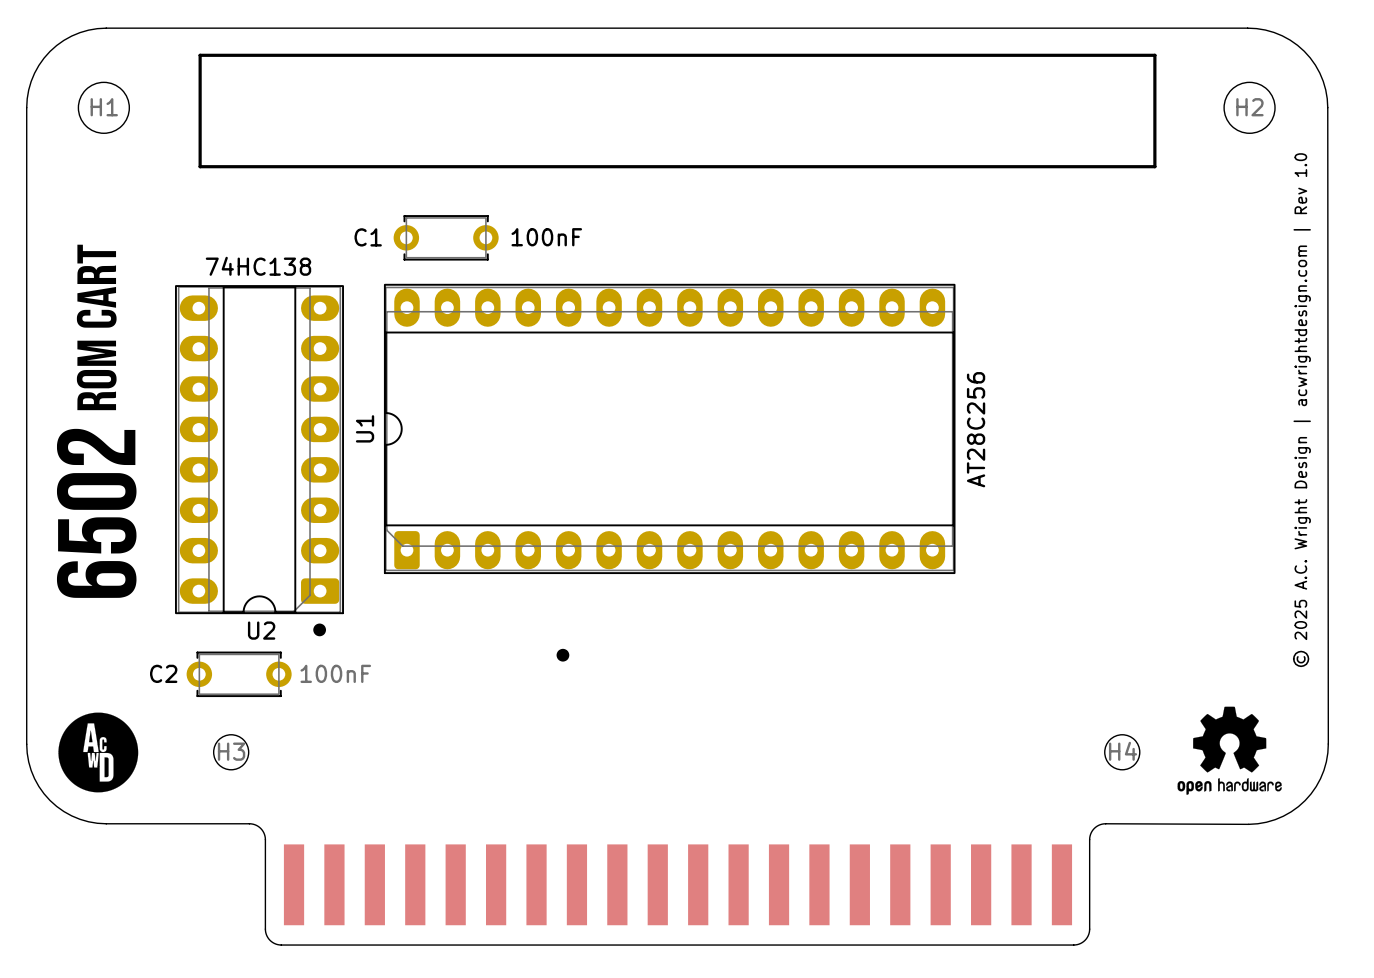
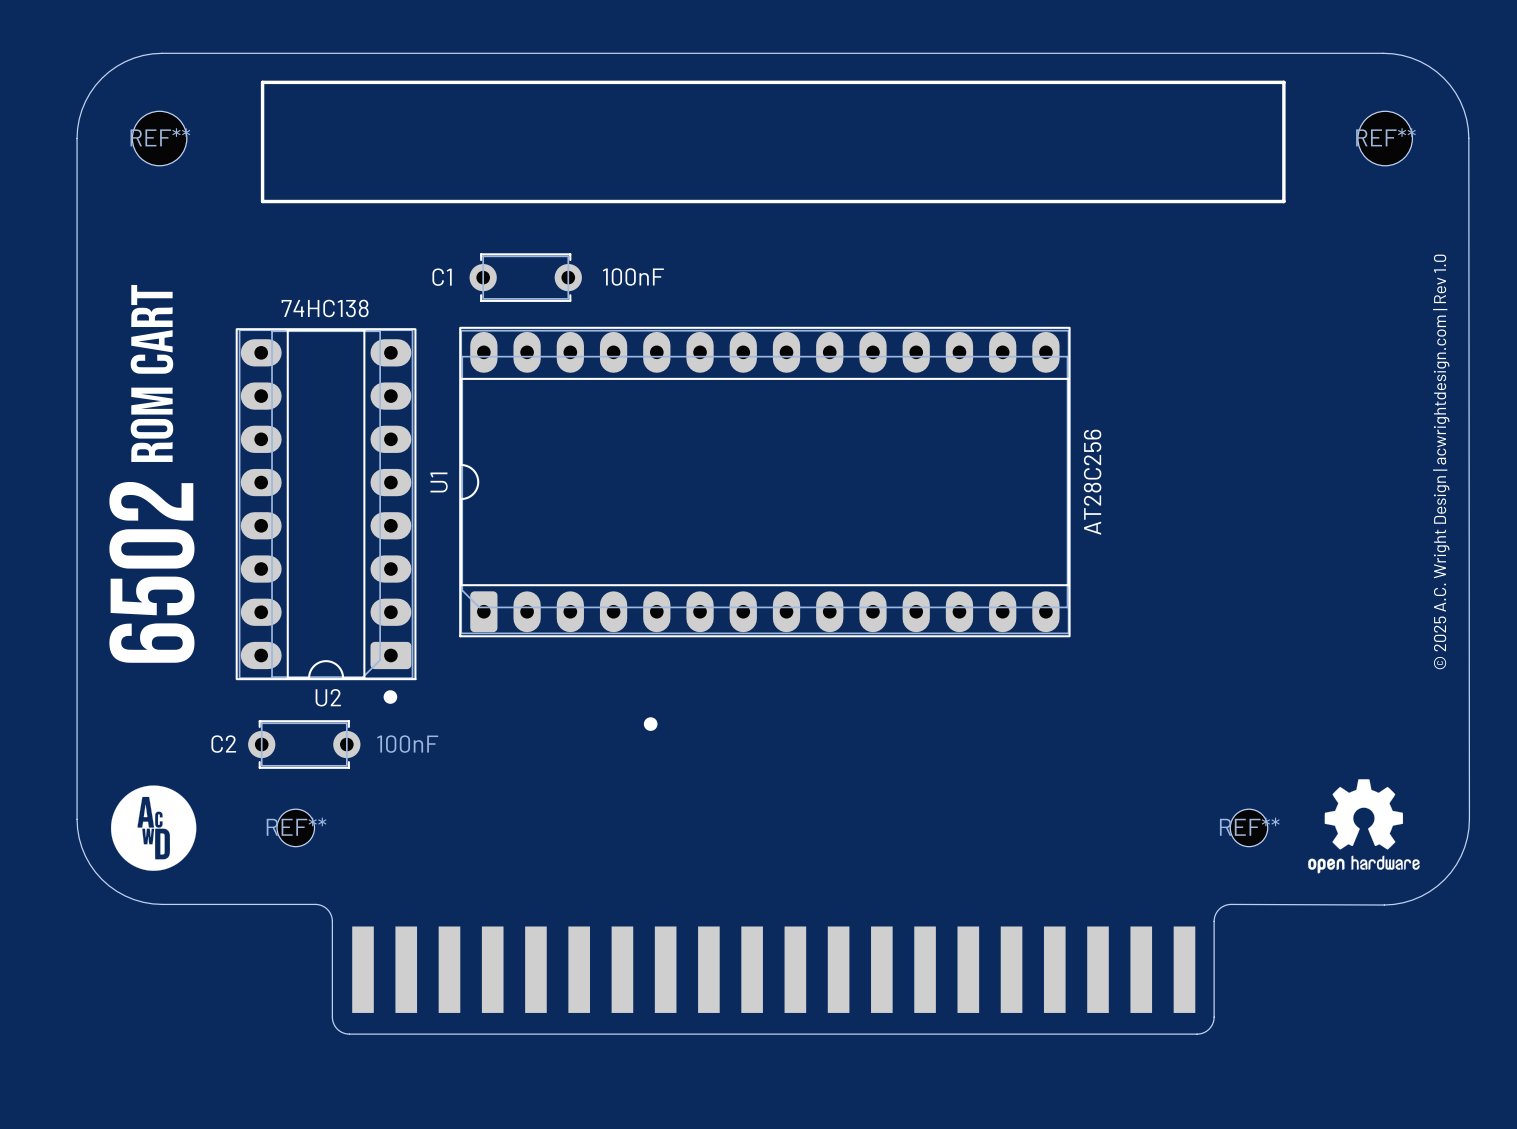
H1 name: H1 (104, 107) -> REF** (160, 137)
H2 name: H2 (1249, 107) -> REF** (1385, 137)
H3 name: H3 (231, 751) -> REF** (296, 826)
H4 name: H4 (1123, 751) -> REF** (1249, 826)

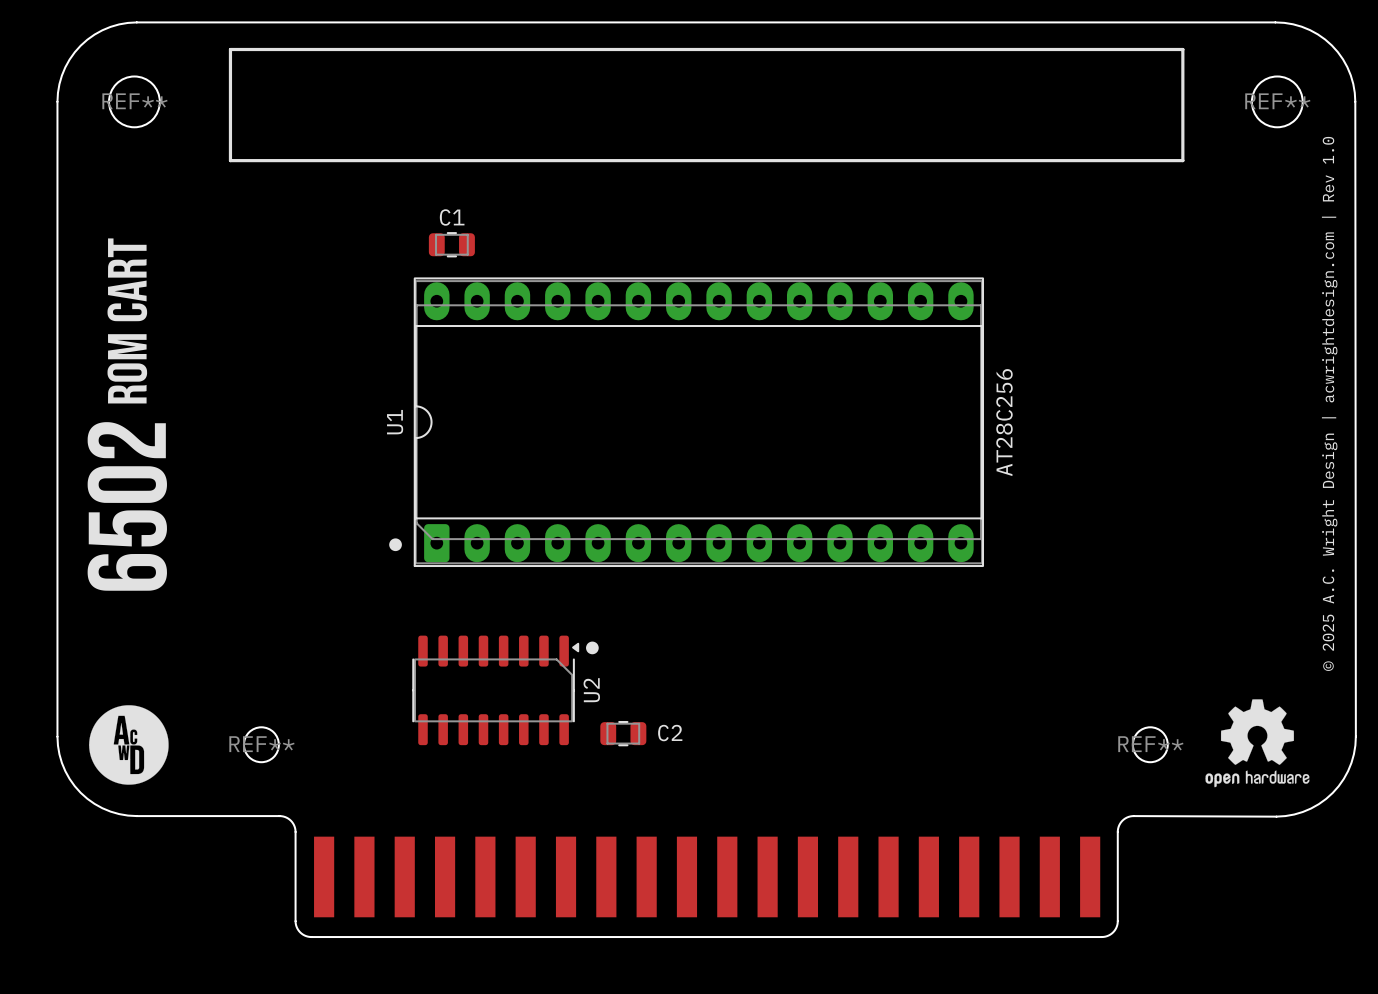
C1 footprint: [469, 253, 582, 302] -> [428, 232, 475, 258]
C1 value: 100nF (633, 276) -> none
C1 name position: C1 (442, 277) -> C1 (452, 217)
U2 value: 74HC138 (325, 308) -> none
U2 footprint: [235, 328, 417, 681] -> [412, 635, 580, 746]
U2 name position: U2 (328, 697) -> U2 (591, 690)
drawing position: (390, 697) -> (395, 544)
C2 footprint: [248, 720, 361, 769] -> [600, 721, 647, 747]
C2 name position: C2 (223, 744) -> C2 (670, 733)
C2 value: 100nF (407, 744) -> none

